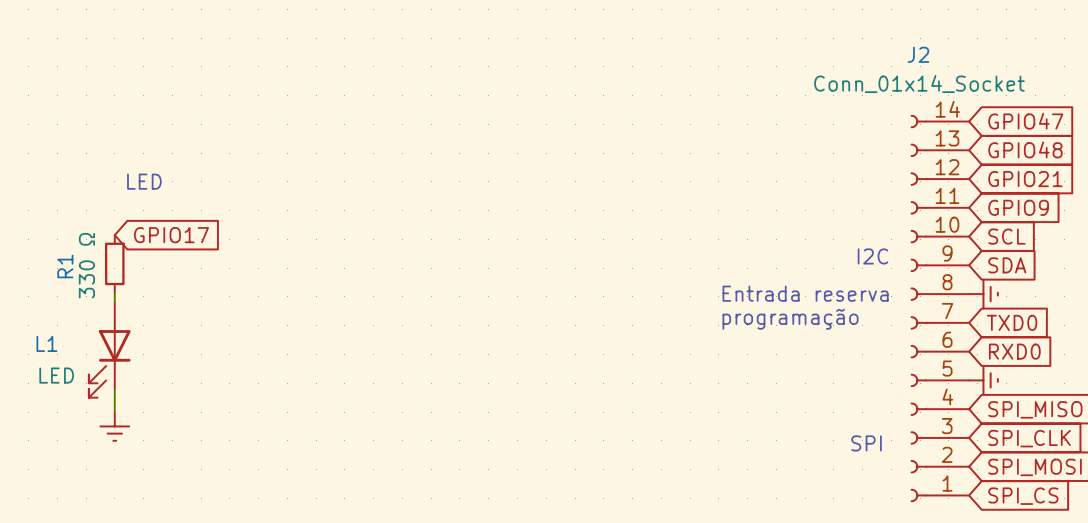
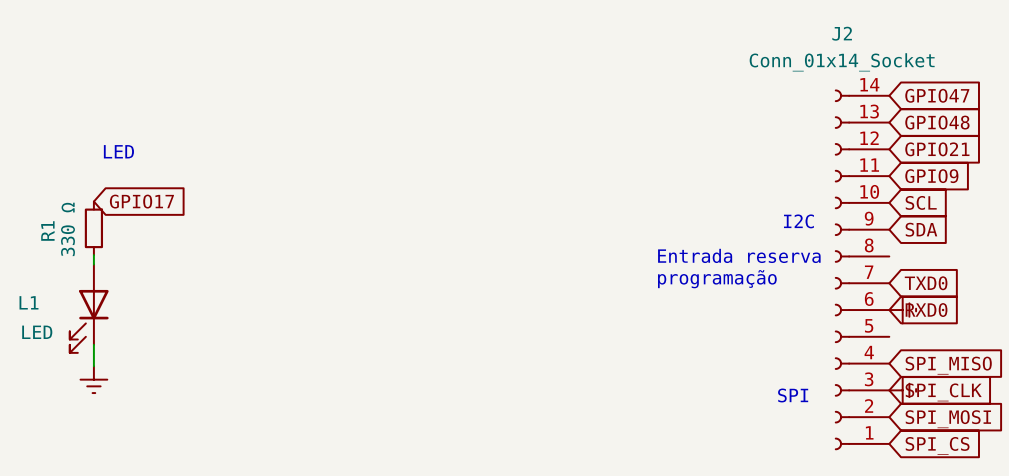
power symbol: (983, 294) -> none
power symbol: none -> (902, 310)
power symbol: (983, 380) -> none
power symbol: none -> (902, 390)

